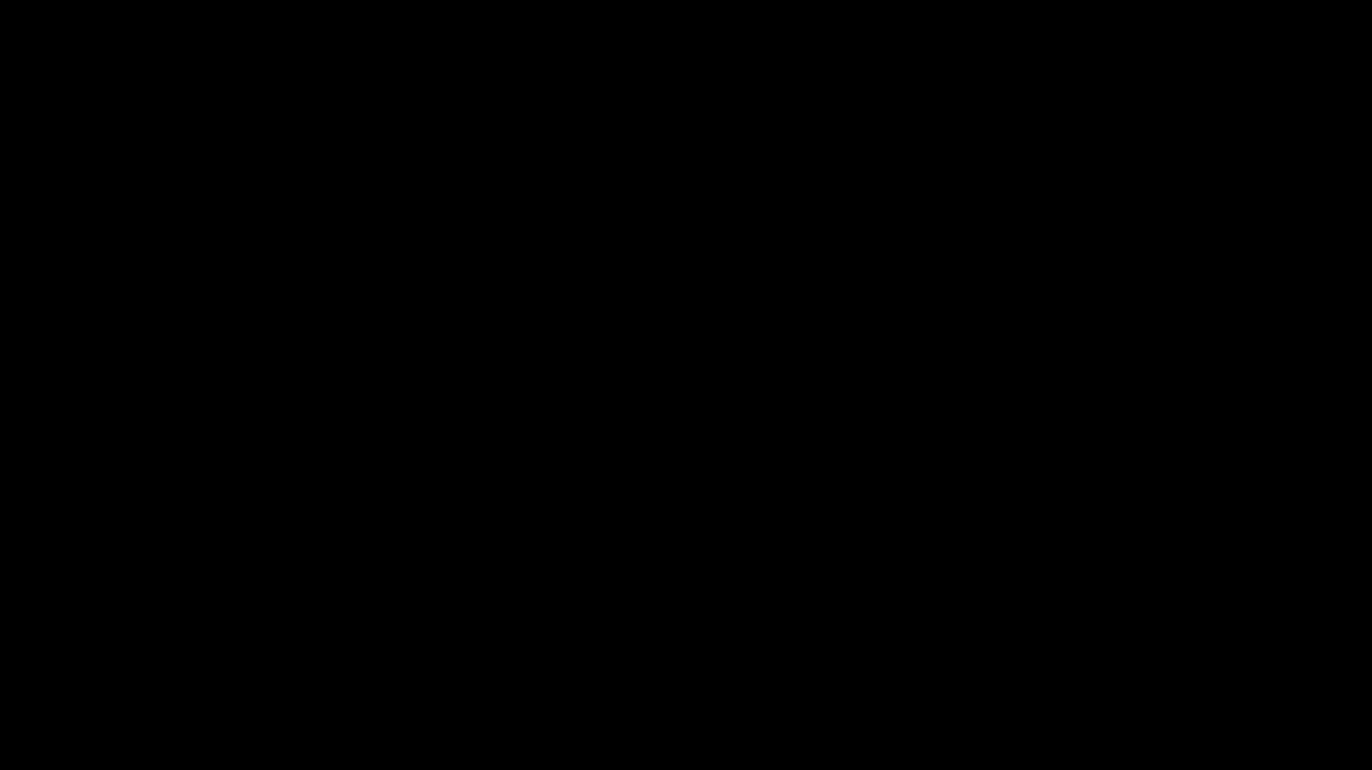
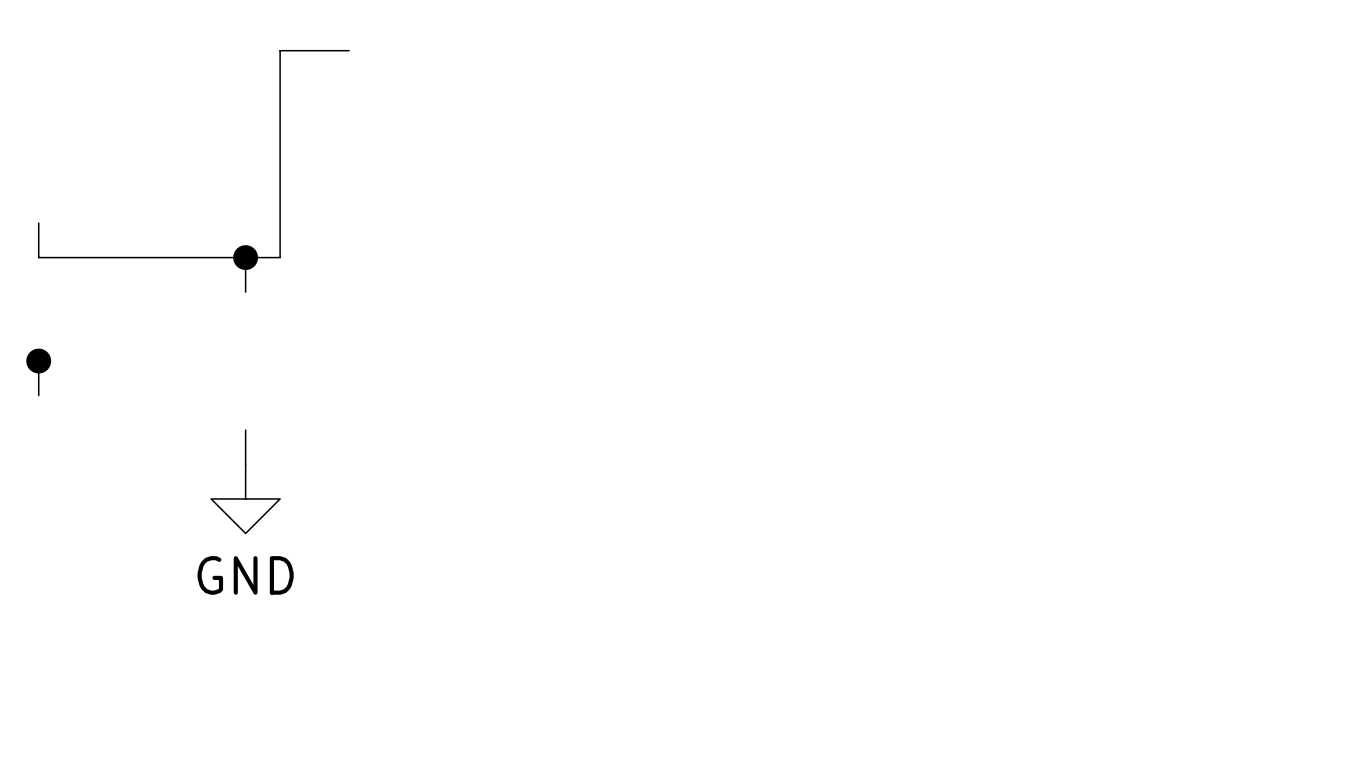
wire: none -> (349, 50) (280, 50) (280, 257) (38, 257) (38, 223)
wire: none -> (245, 257) (245, 292)
junction: none -> (245, 257)
wire: none -> (38, 361) (38, 395)
junction: none -> (38, 361)
wire: none -> (245, 430) (245, 464)
power symbol: none -> GND (245, 498)

